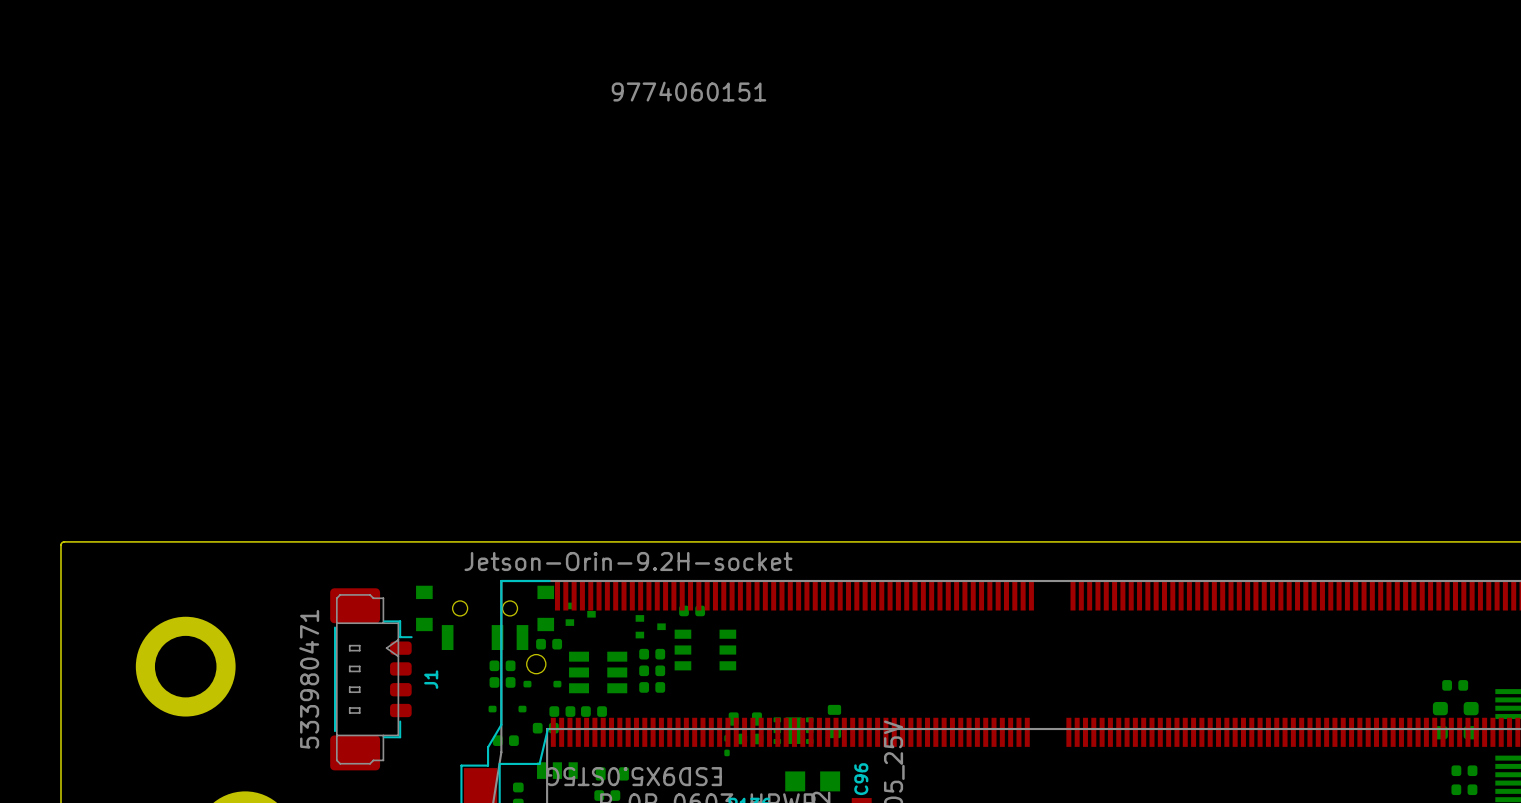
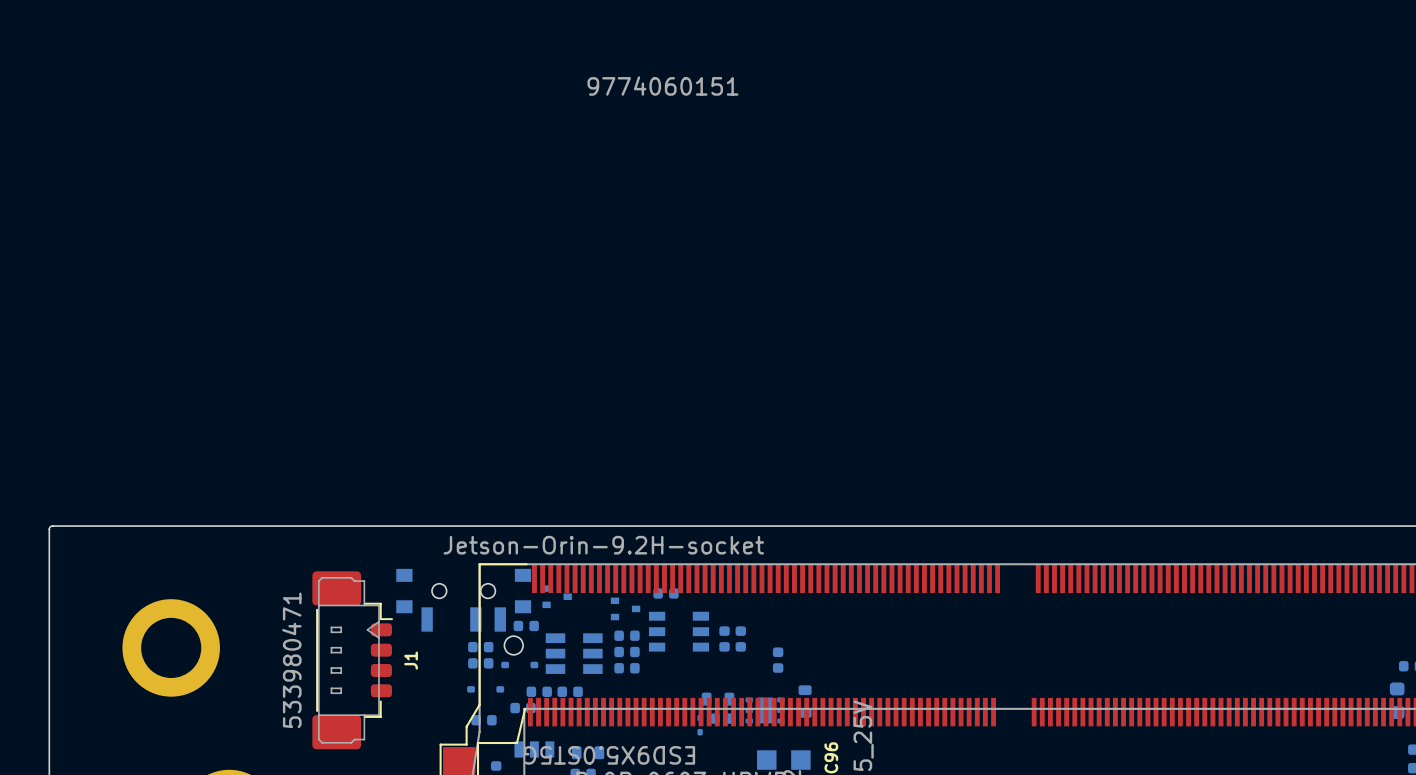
part: none -> (724, 638)
part: none -> (740, 638)
part: none -> (778, 660)

